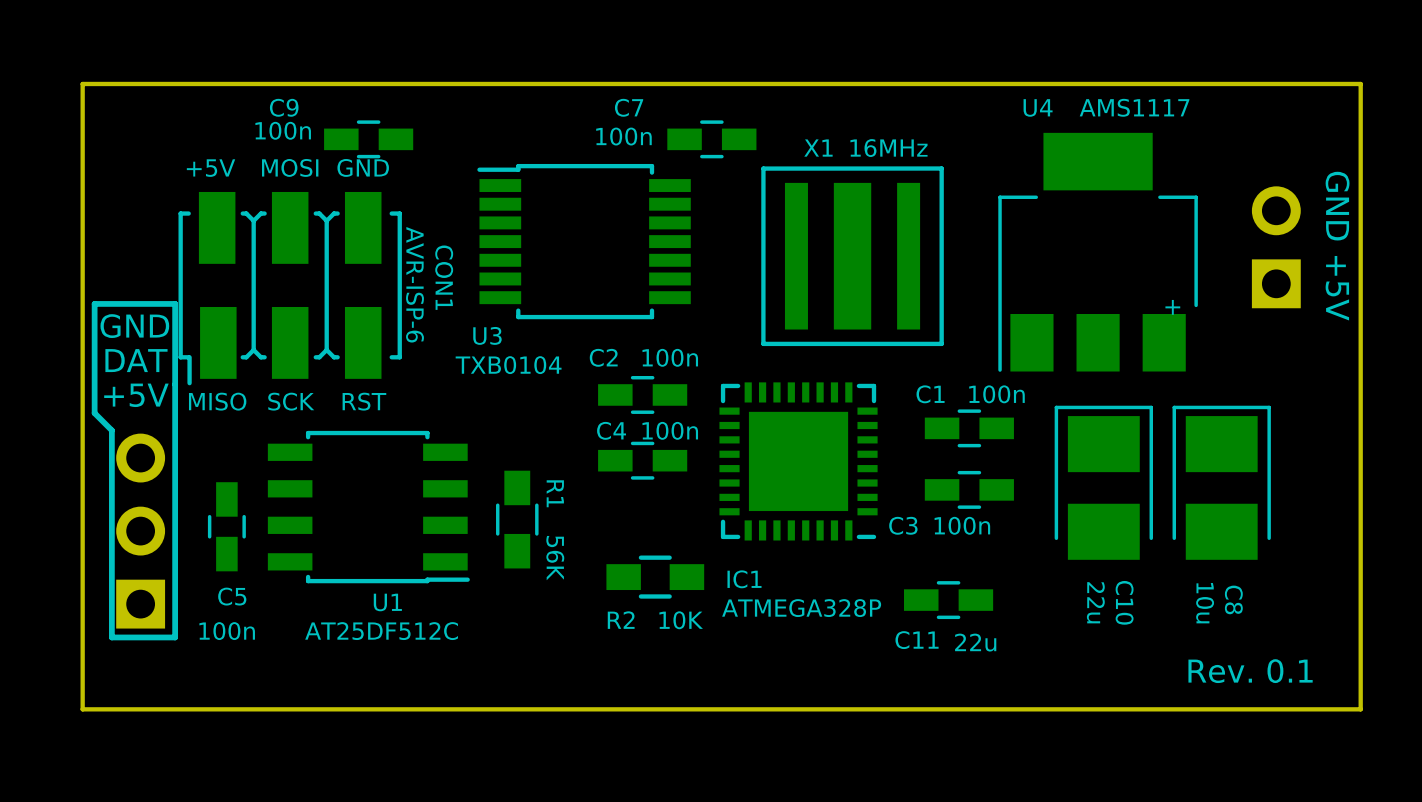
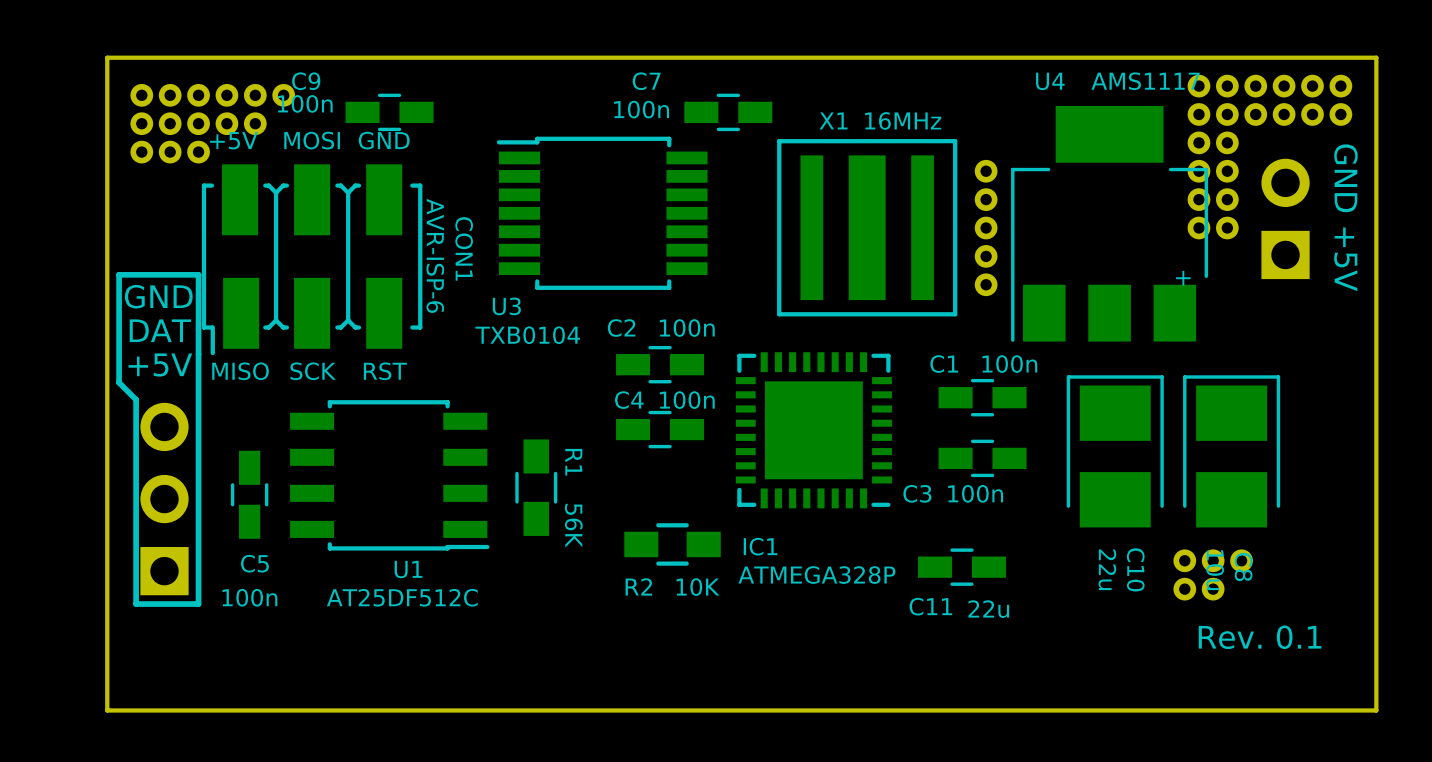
board edge: (1360, 83) (1360, 709) (82, 709) -> (1368, 57) (1376, 57) (1376, 710) (107, 710)
part: none -> (1198, 86)
part: none -> (1227, 86)
part: none -> (1255, 86)
part: none -> (1284, 86)
part: none -> (1312, 86)
part: none -> (1340, 86)
part: none -> (141, 95)
part: none -> (170, 95)
part: none -> (198, 95)
part: none -> (226, 95)
part: none -> (255, 95)
part: none -> (283, 95)
part: none -> (1198, 114)
part: none -> (1227, 114)
part: none -> (1255, 114)
part: none -> (1284, 114)
part: none -> (1312, 114)
part: none -> (1340, 114)
part: none -> (141, 123)
part: none -> (170, 123)
part: none -> (198, 123)
part: none -> (226, 123)
part: none -> (255, 123)
part: none -> (1198, 142)
part: none -> (1227, 142)
part: none -> (141, 152)
part: none -> (170, 152)
part: none -> (198, 152)
part: none -> (986, 171)
part: none -> (1198, 171)
part: none -> (1227, 171)
part: none -> (986, 199)
part: none -> (1198, 199)
part: none -> (1227, 199)
part: none -> (986, 228)
part: none -> (1198, 228)
part: none -> (1227, 228)
part: none -> (986, 256)
part: none -> (986, 284)
part: none -> (1184, 560)
part: none -> (1213, 560)
part: none -> (1241, 560)
part: none -> (1184, 589)
part: none -> (1213, 589)
board edge: none -> (107, 675) (107, 710)

